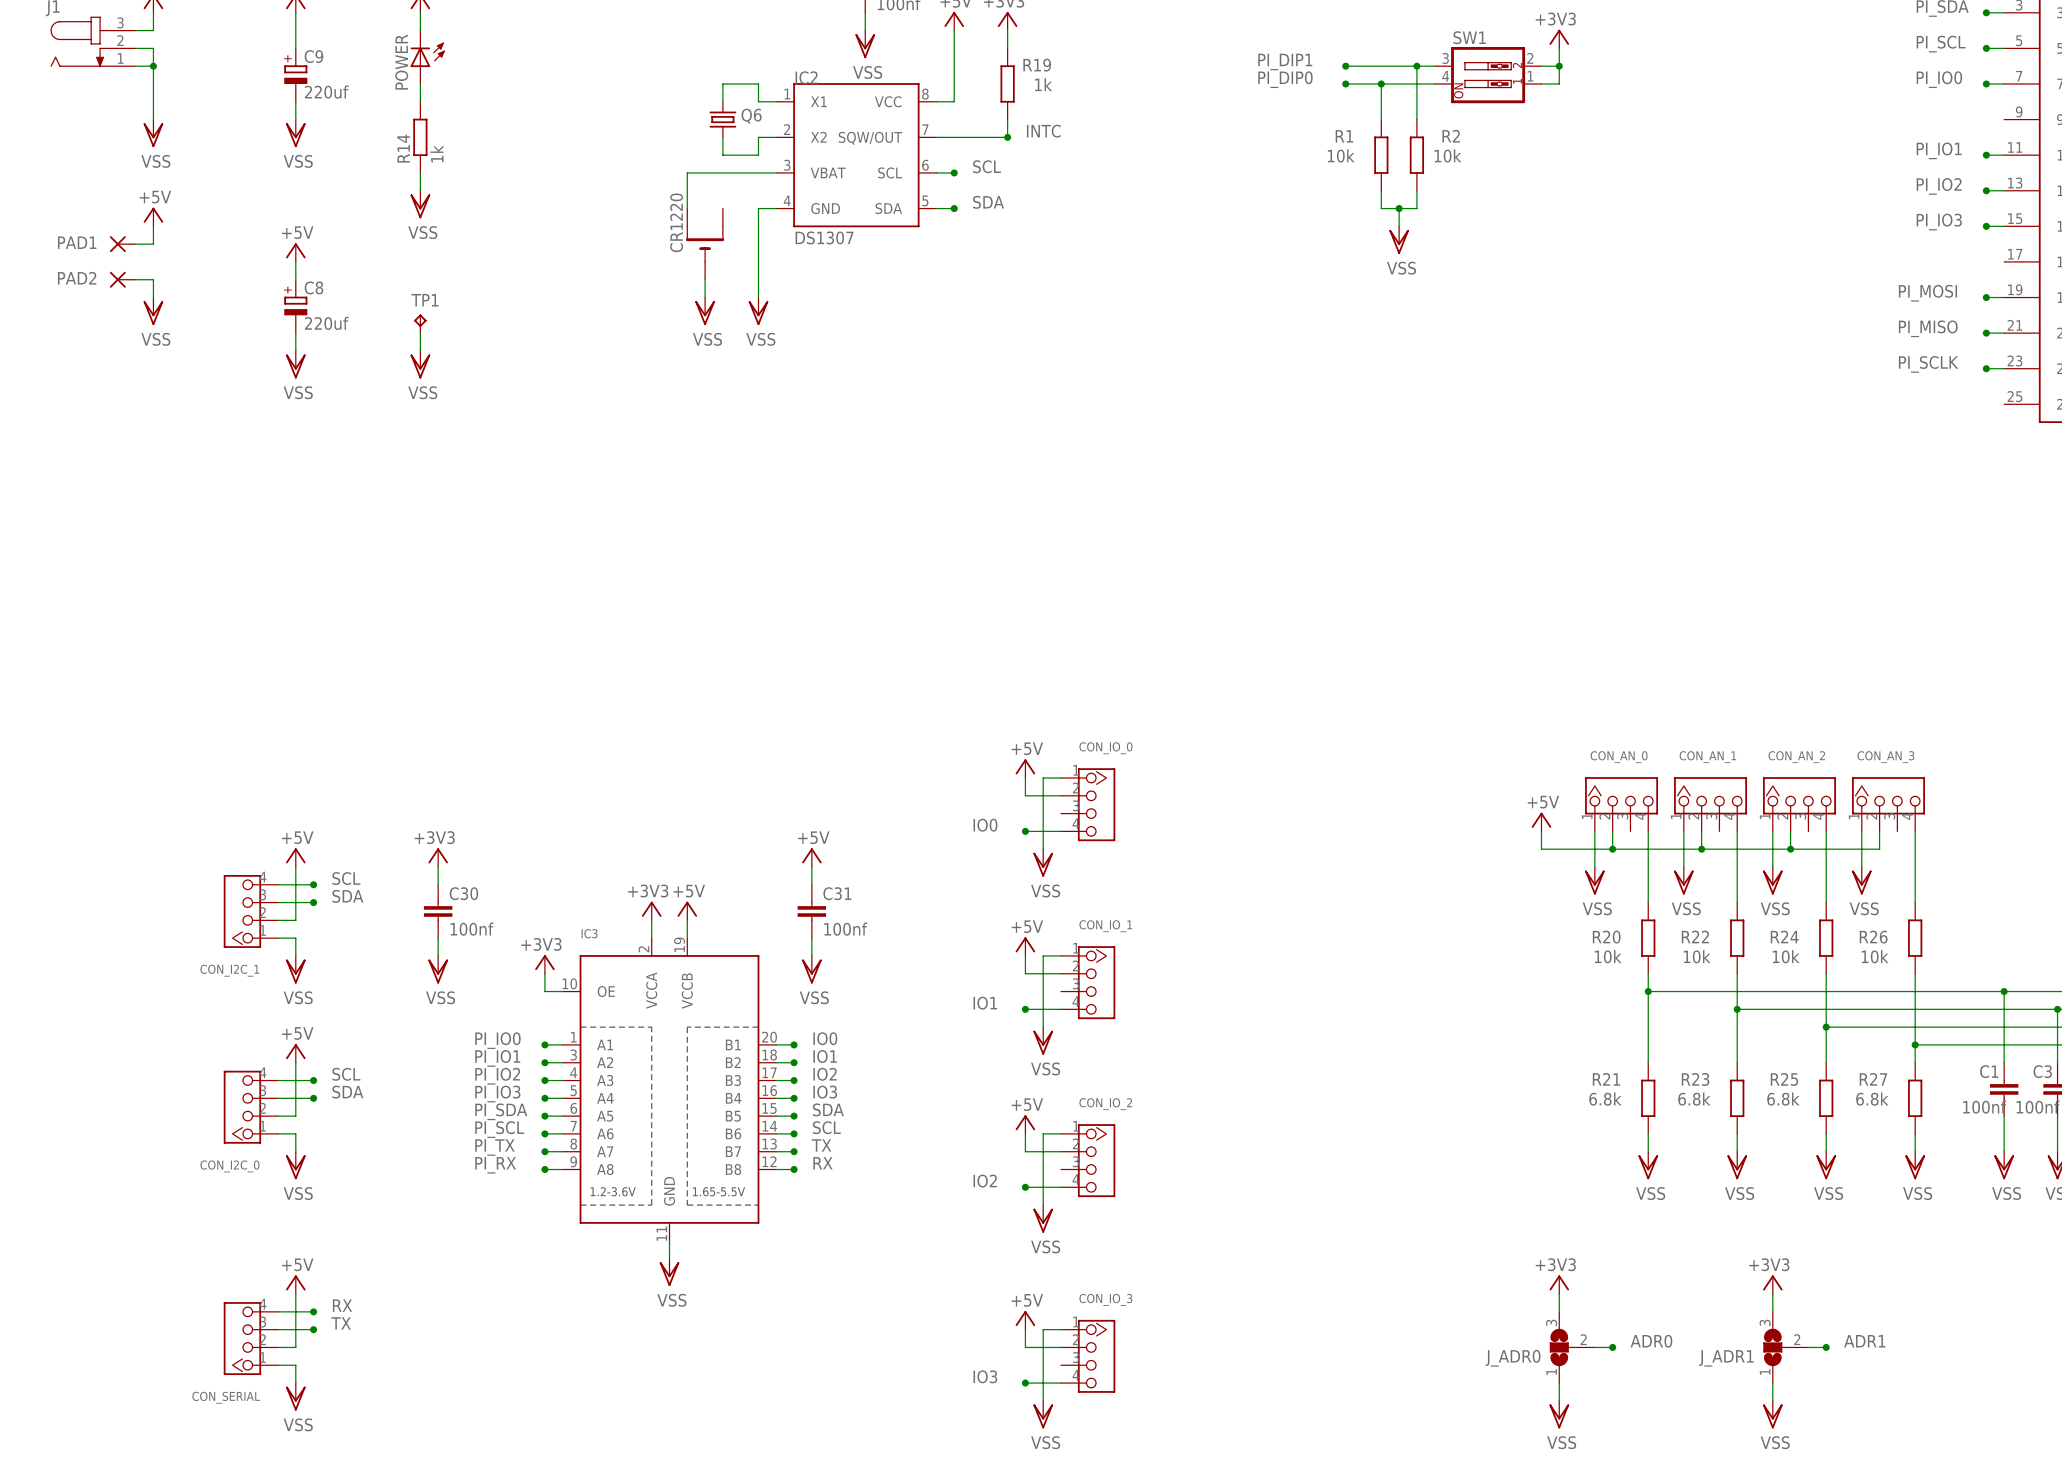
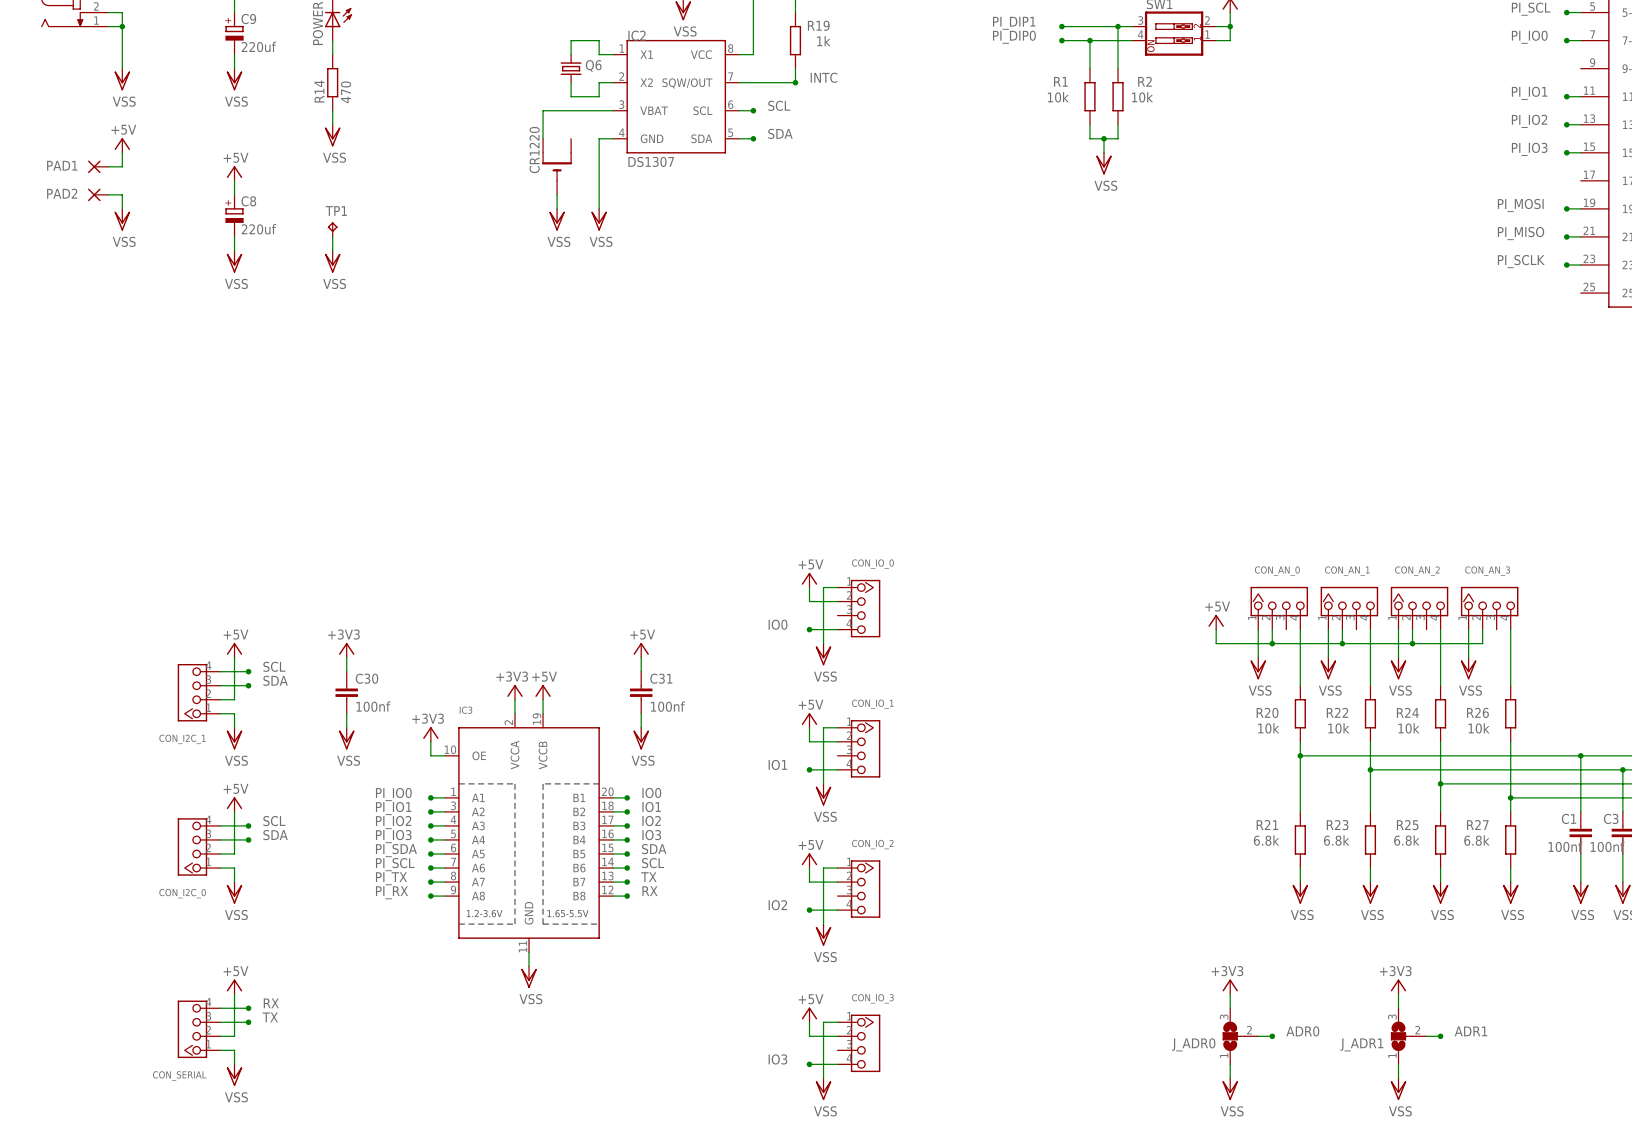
R14 value: 1k (437, 153) -> 470 (346, 92)

